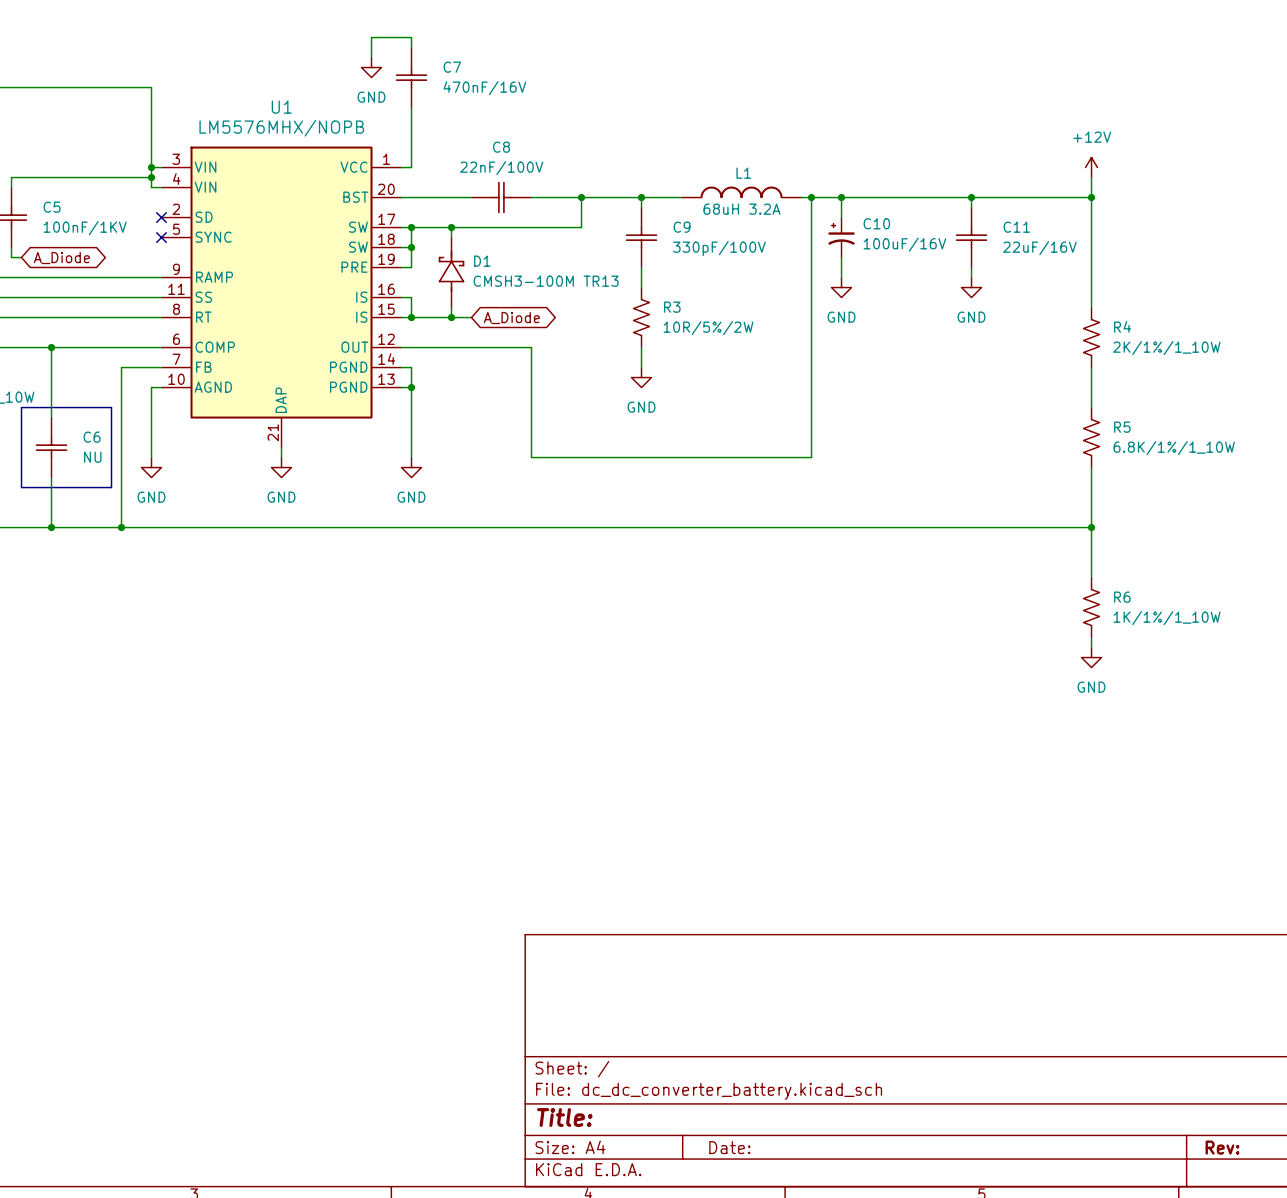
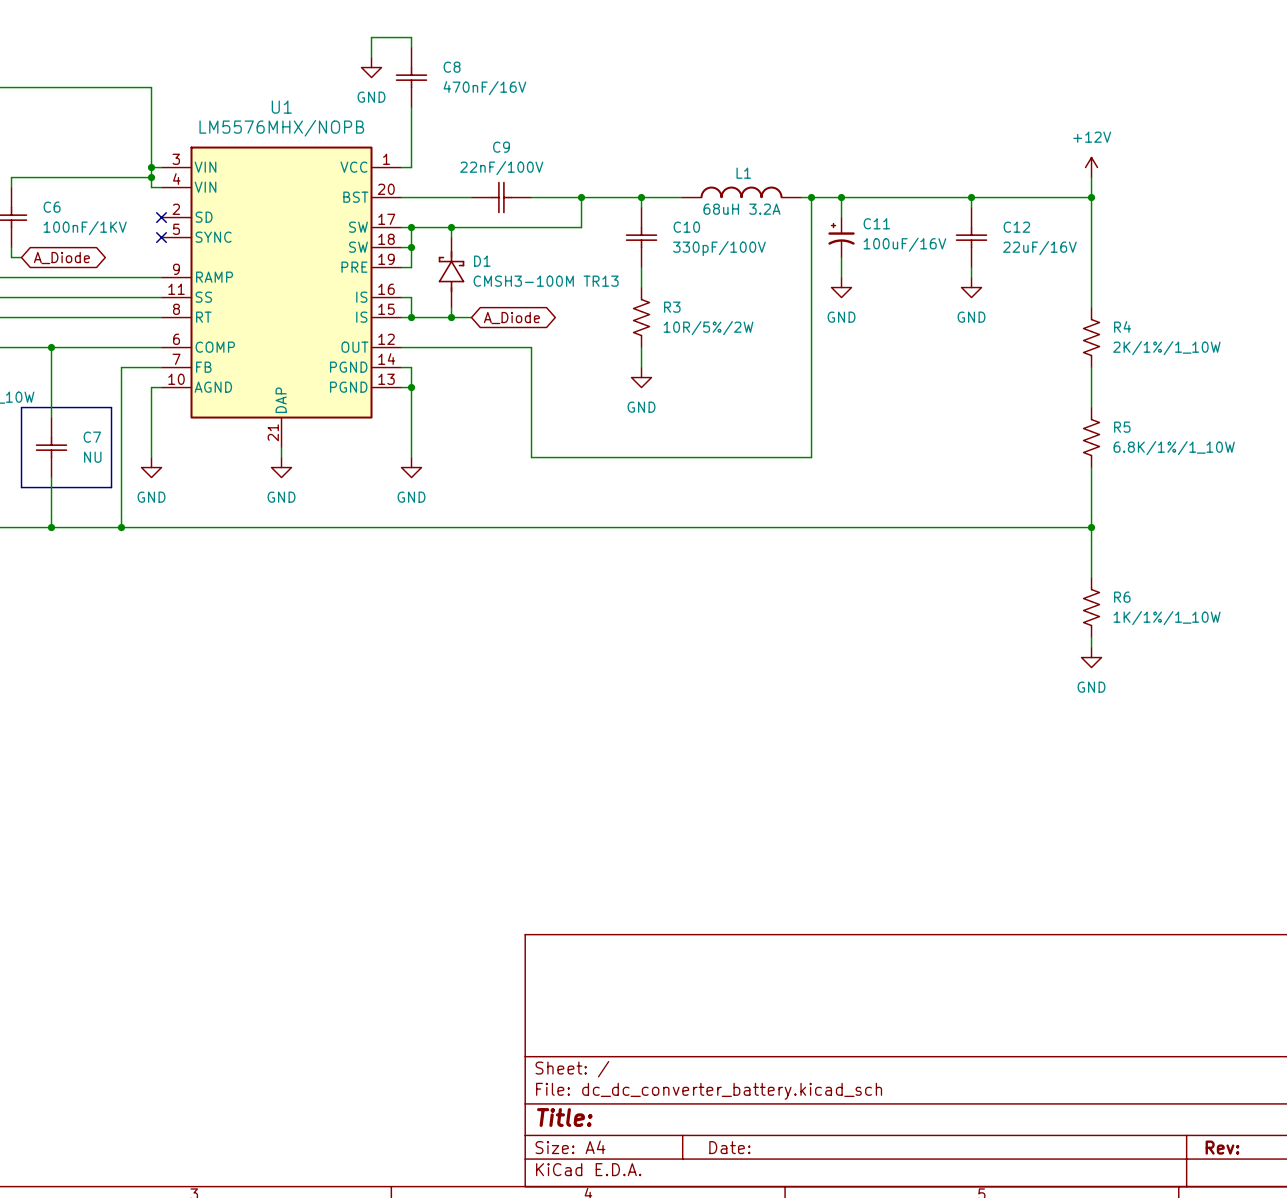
C7 name: C7 (452, 67) -> C8 (452, 67)
C8 name: C8 (501, 147) -> C9 (501, 147)
C5 name: C5 (52, 207) -> C6 (52, 207)
C10 name: C10 (876, 223) -> C11 (876, 223)
C9 name: C9 (682, 227) -> C10 (686, 227)
C11 name: C11 (1016, 227) -> C12 (1016, 227)
C6 name: C6 (92, 437) -> C7 (92, 437)

